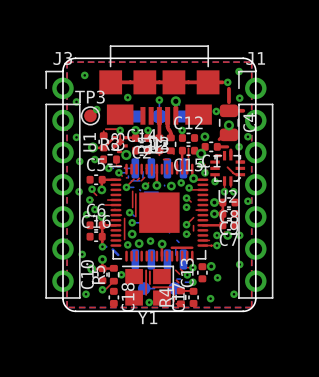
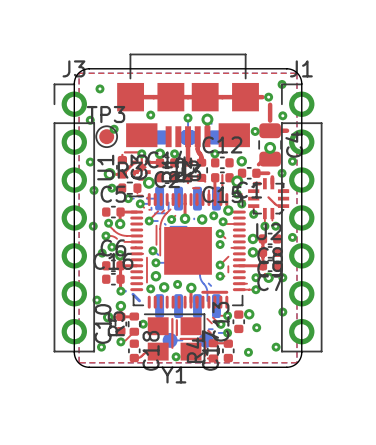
top track: none -> (166, 213) (161, 220) (160, 228)
top track: none -> (114, 230) (127, 235)
top track: none -> (110, 235) (117, 238)
bottom track: none -> (199, 274) (207, 292)
top track: none -> (150, 351) (137, 358)

